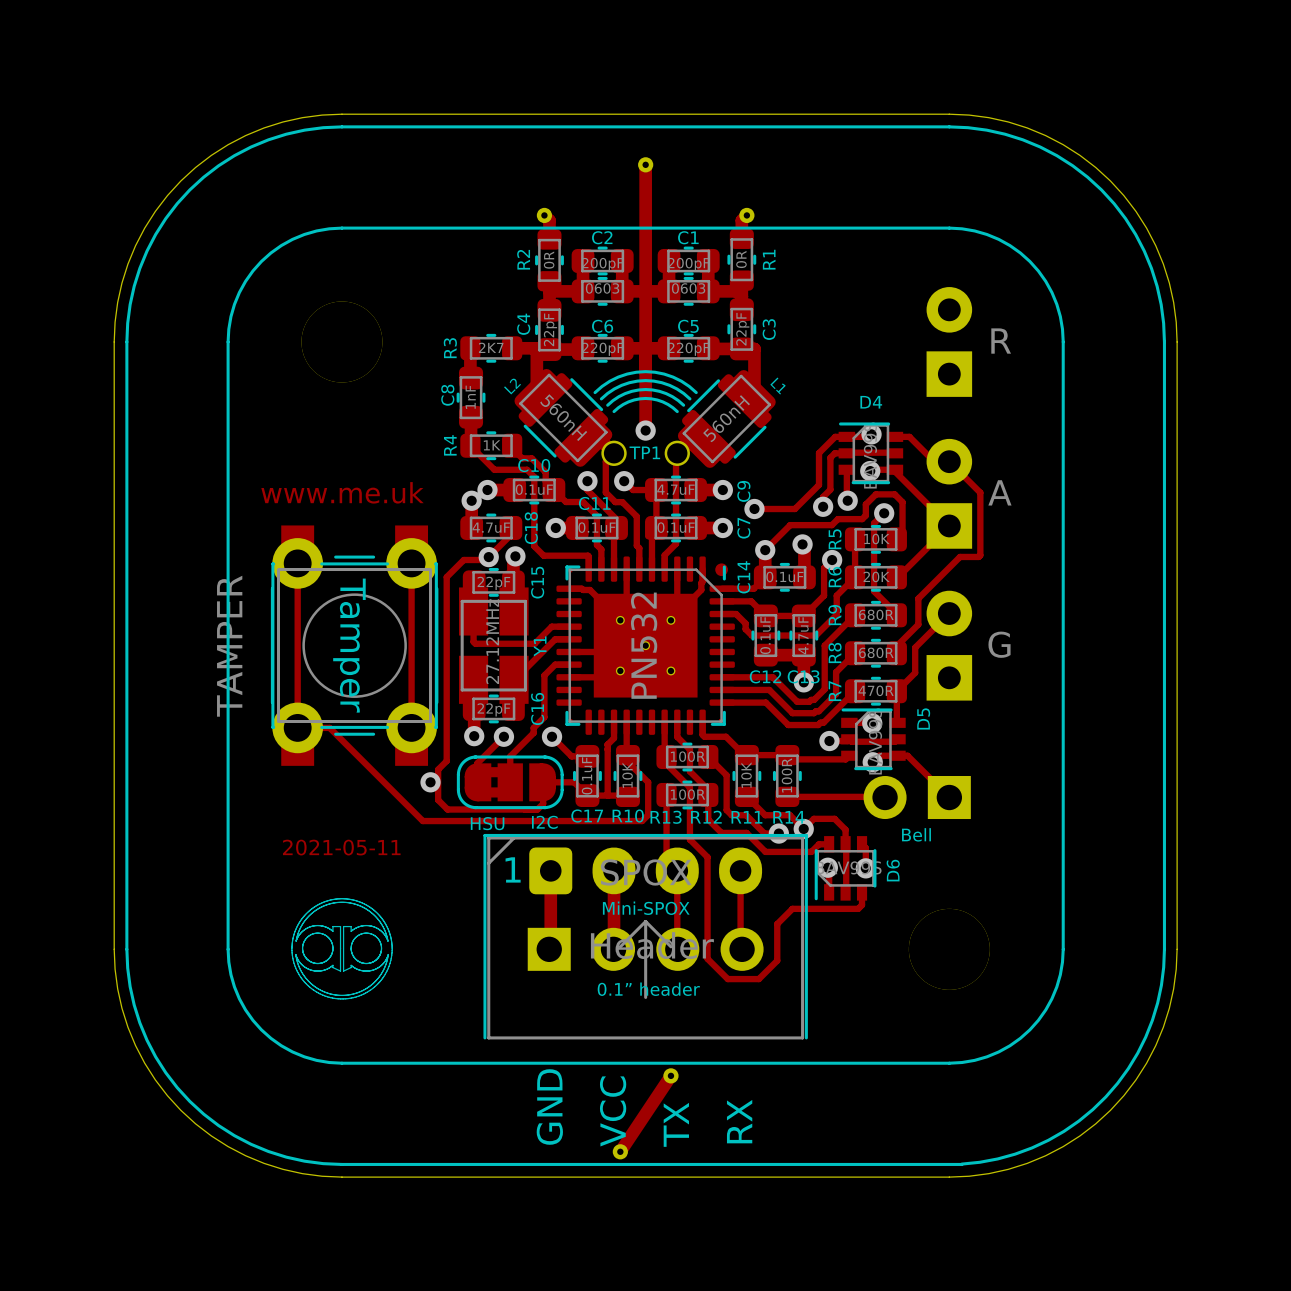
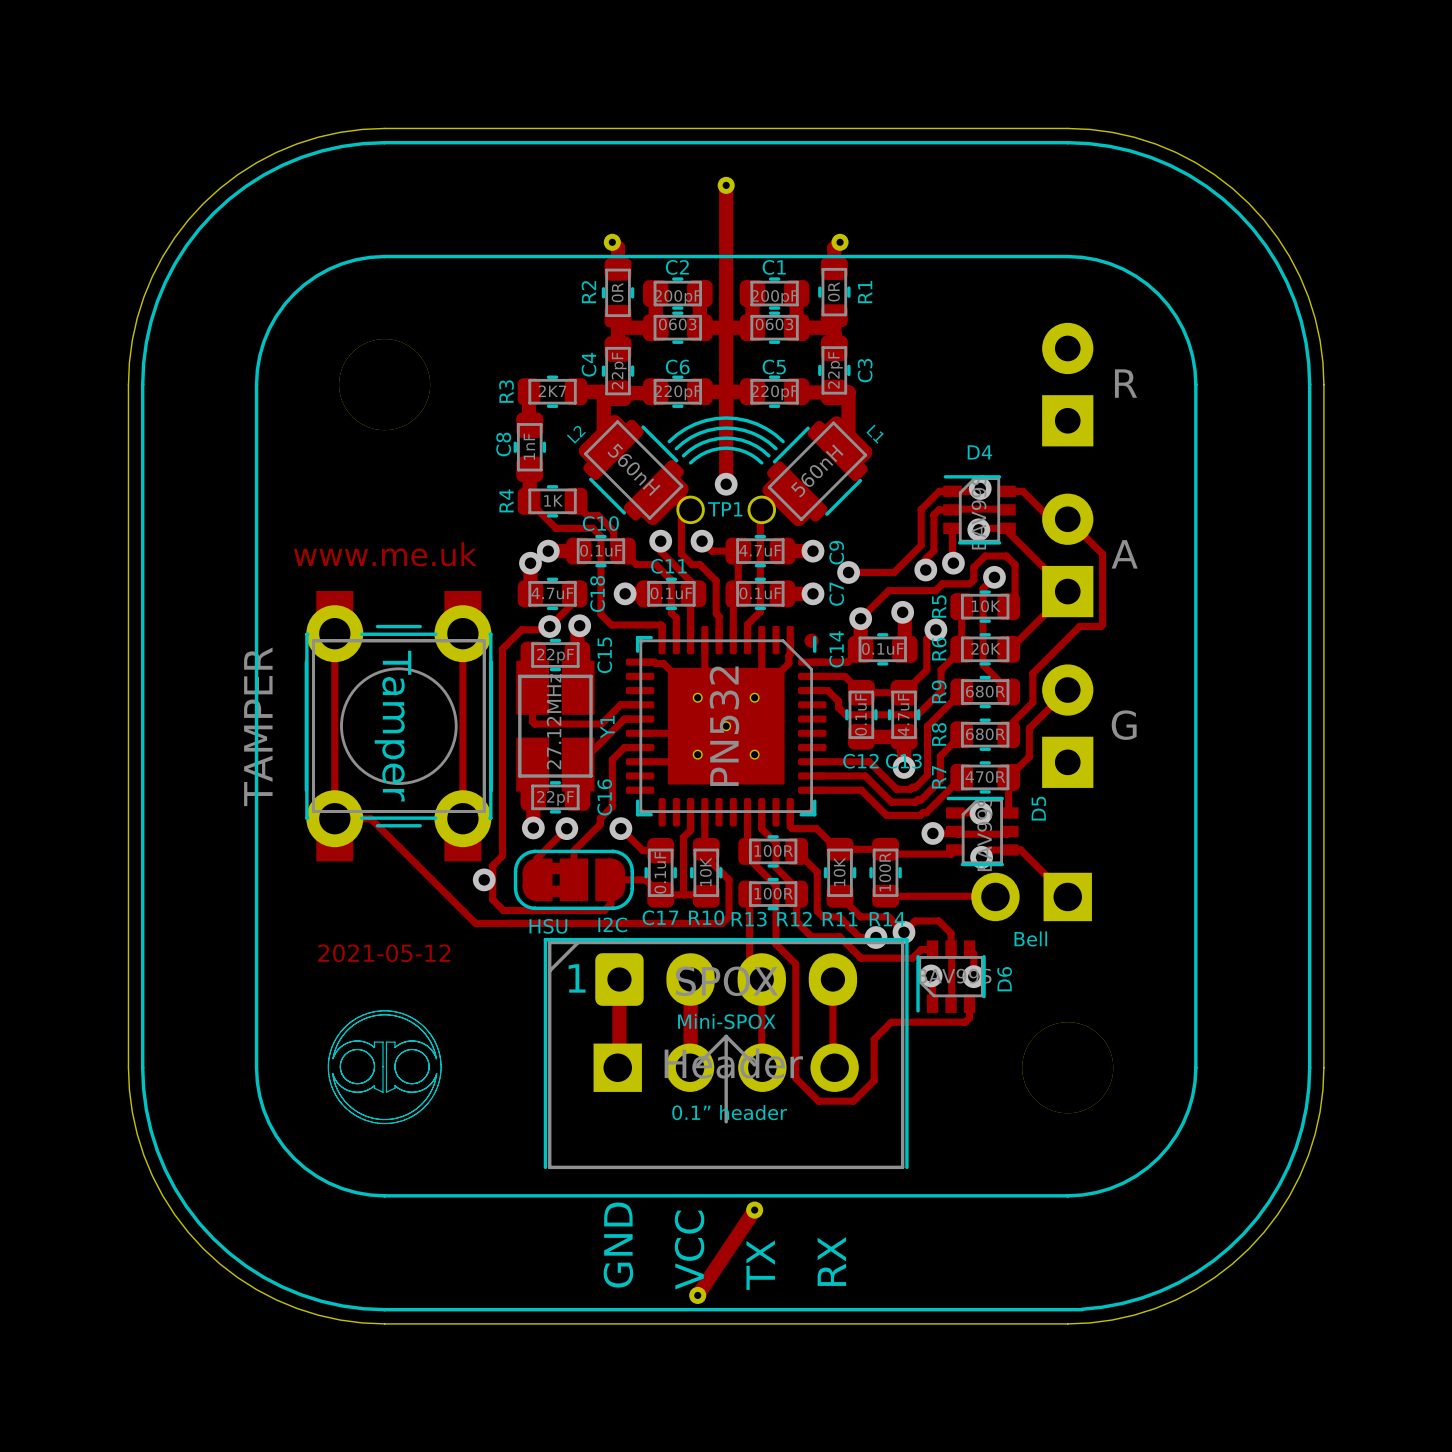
text: 2021-05-11 (341, 847) -> 2021-05-12 (384, 953)

